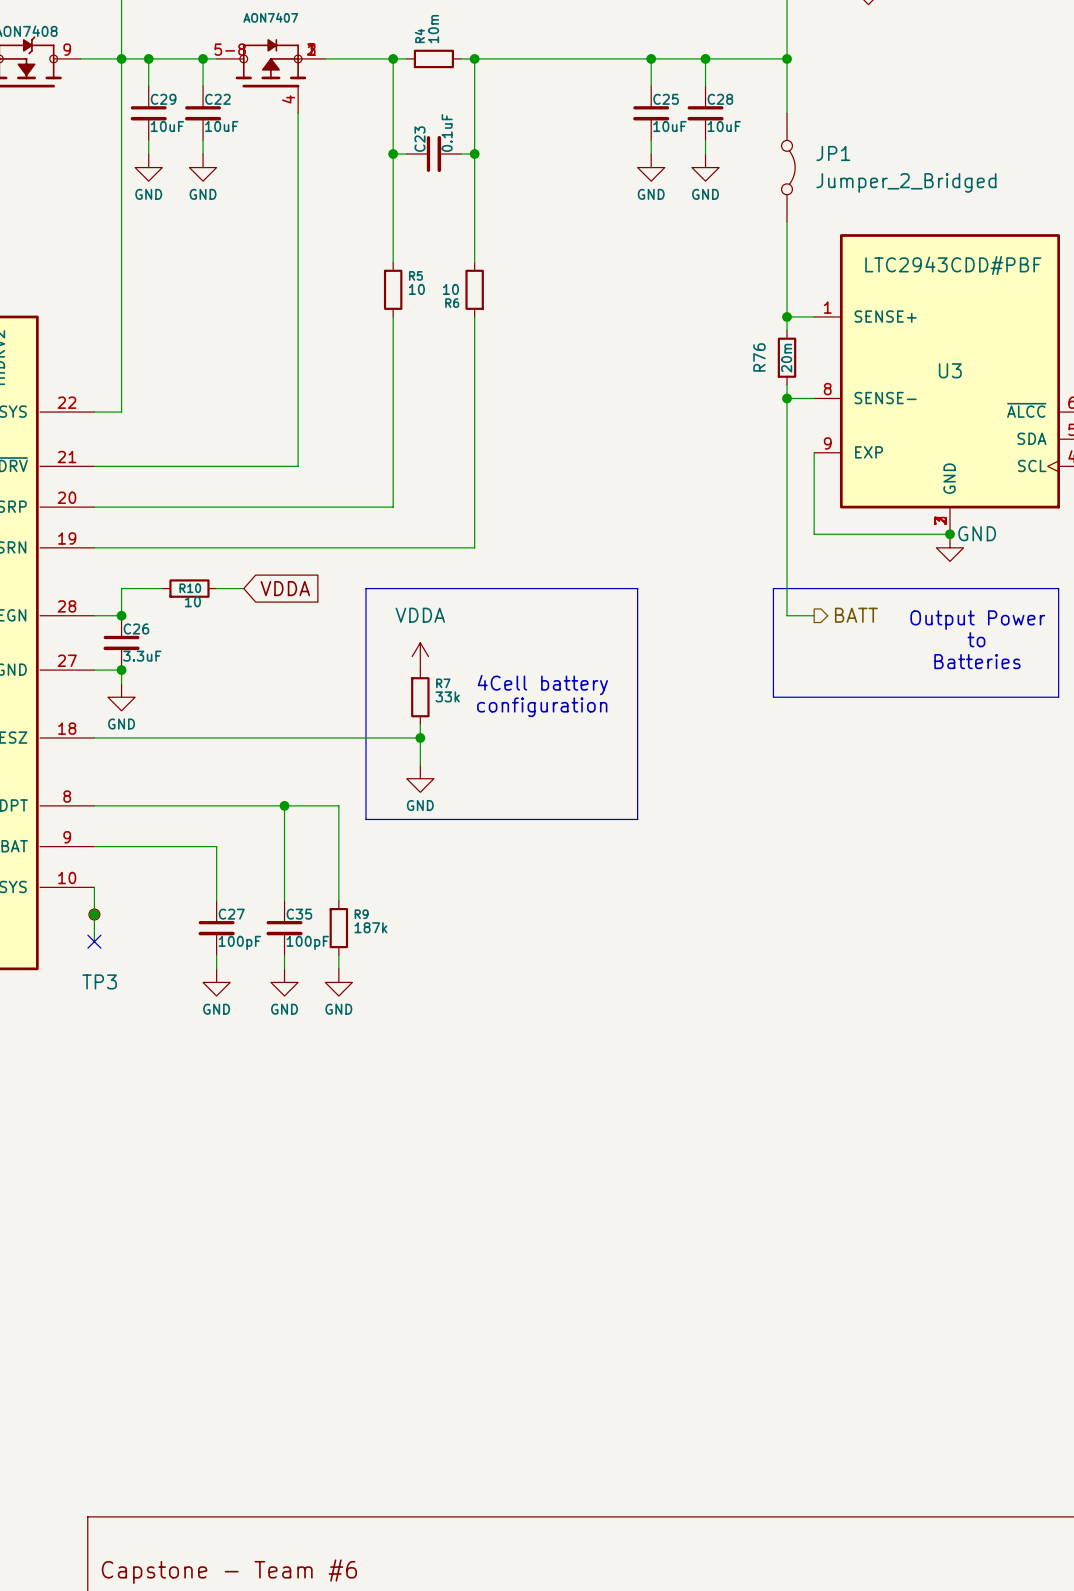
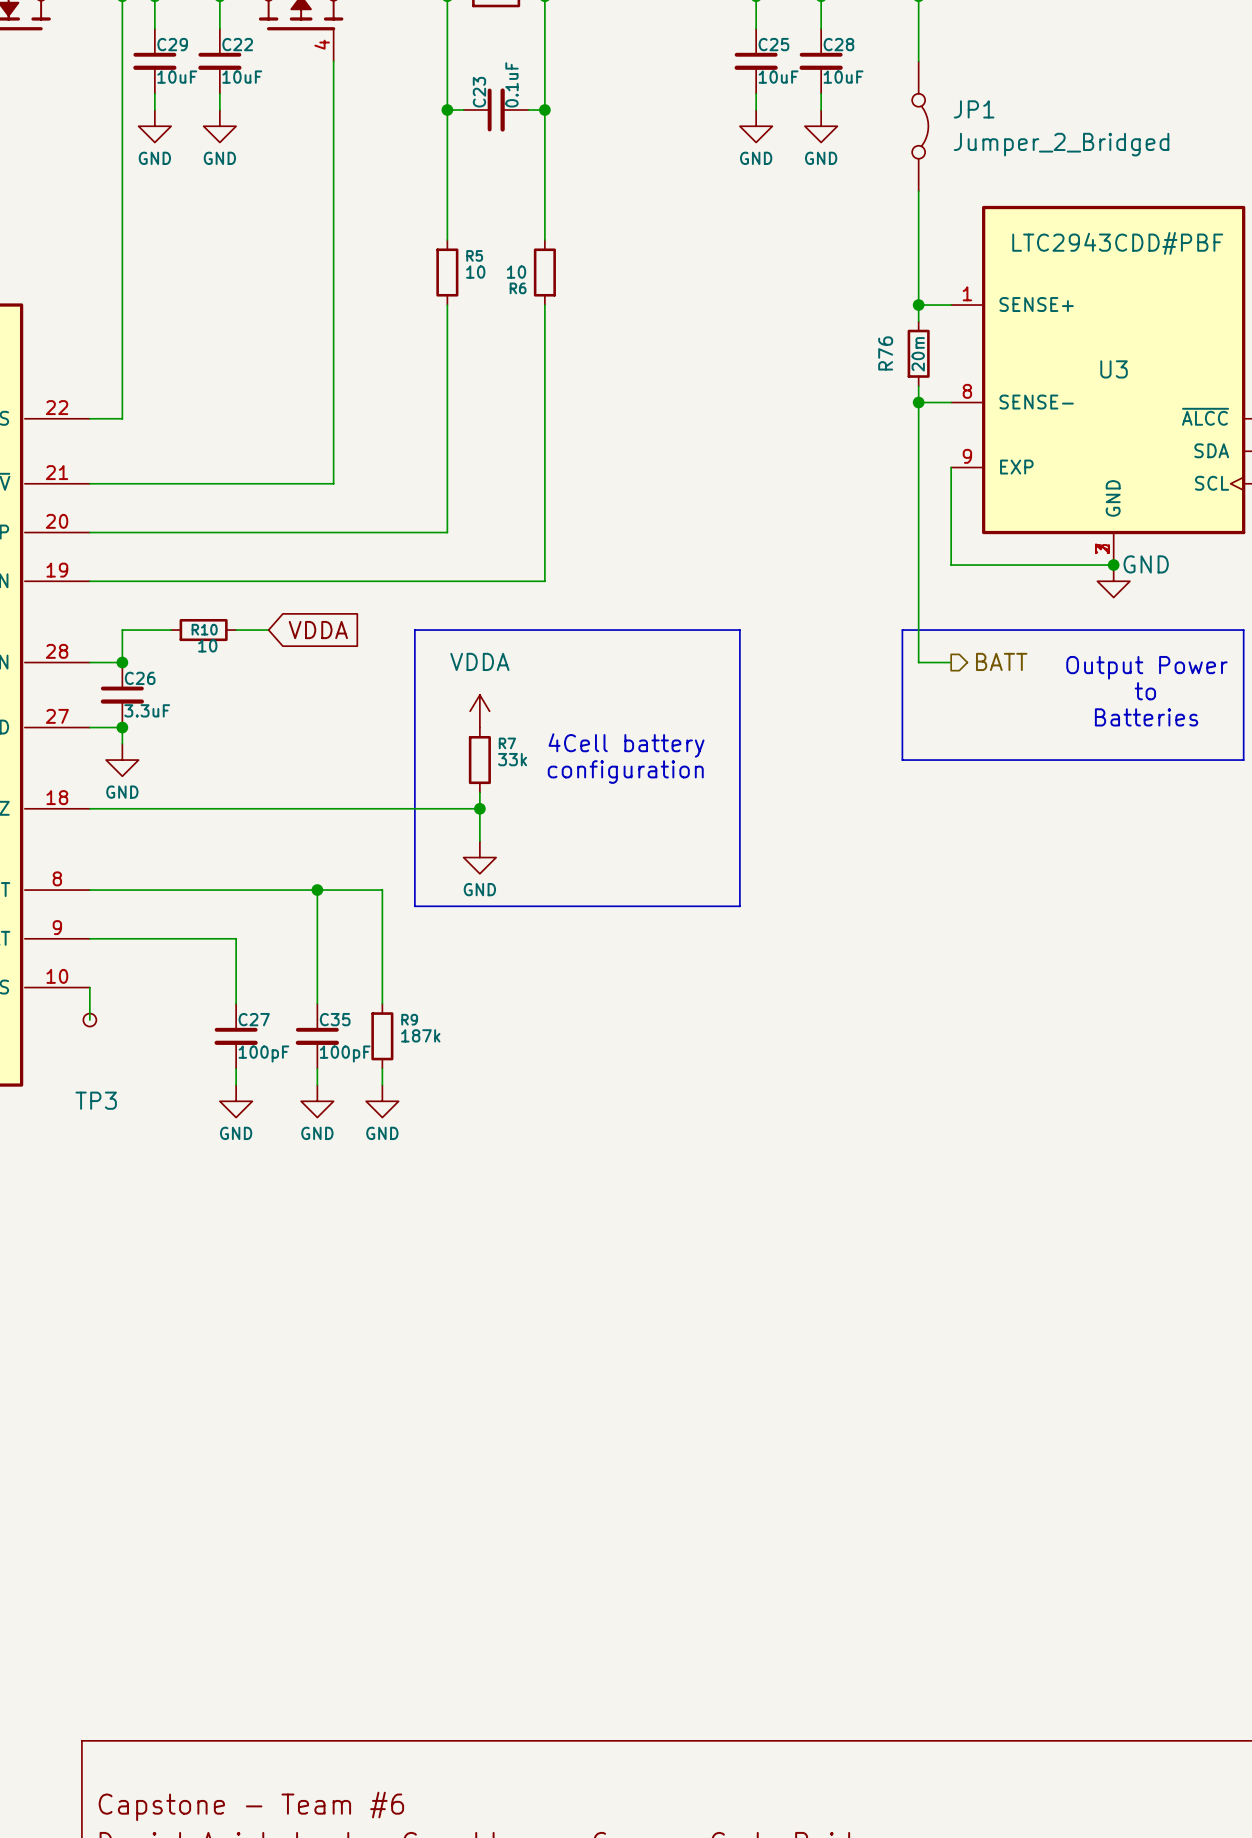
wire: (94, 914) (94, 941) -> none
junction: (94, 914) -> none
no-connect mark: (94, 941) -> none

